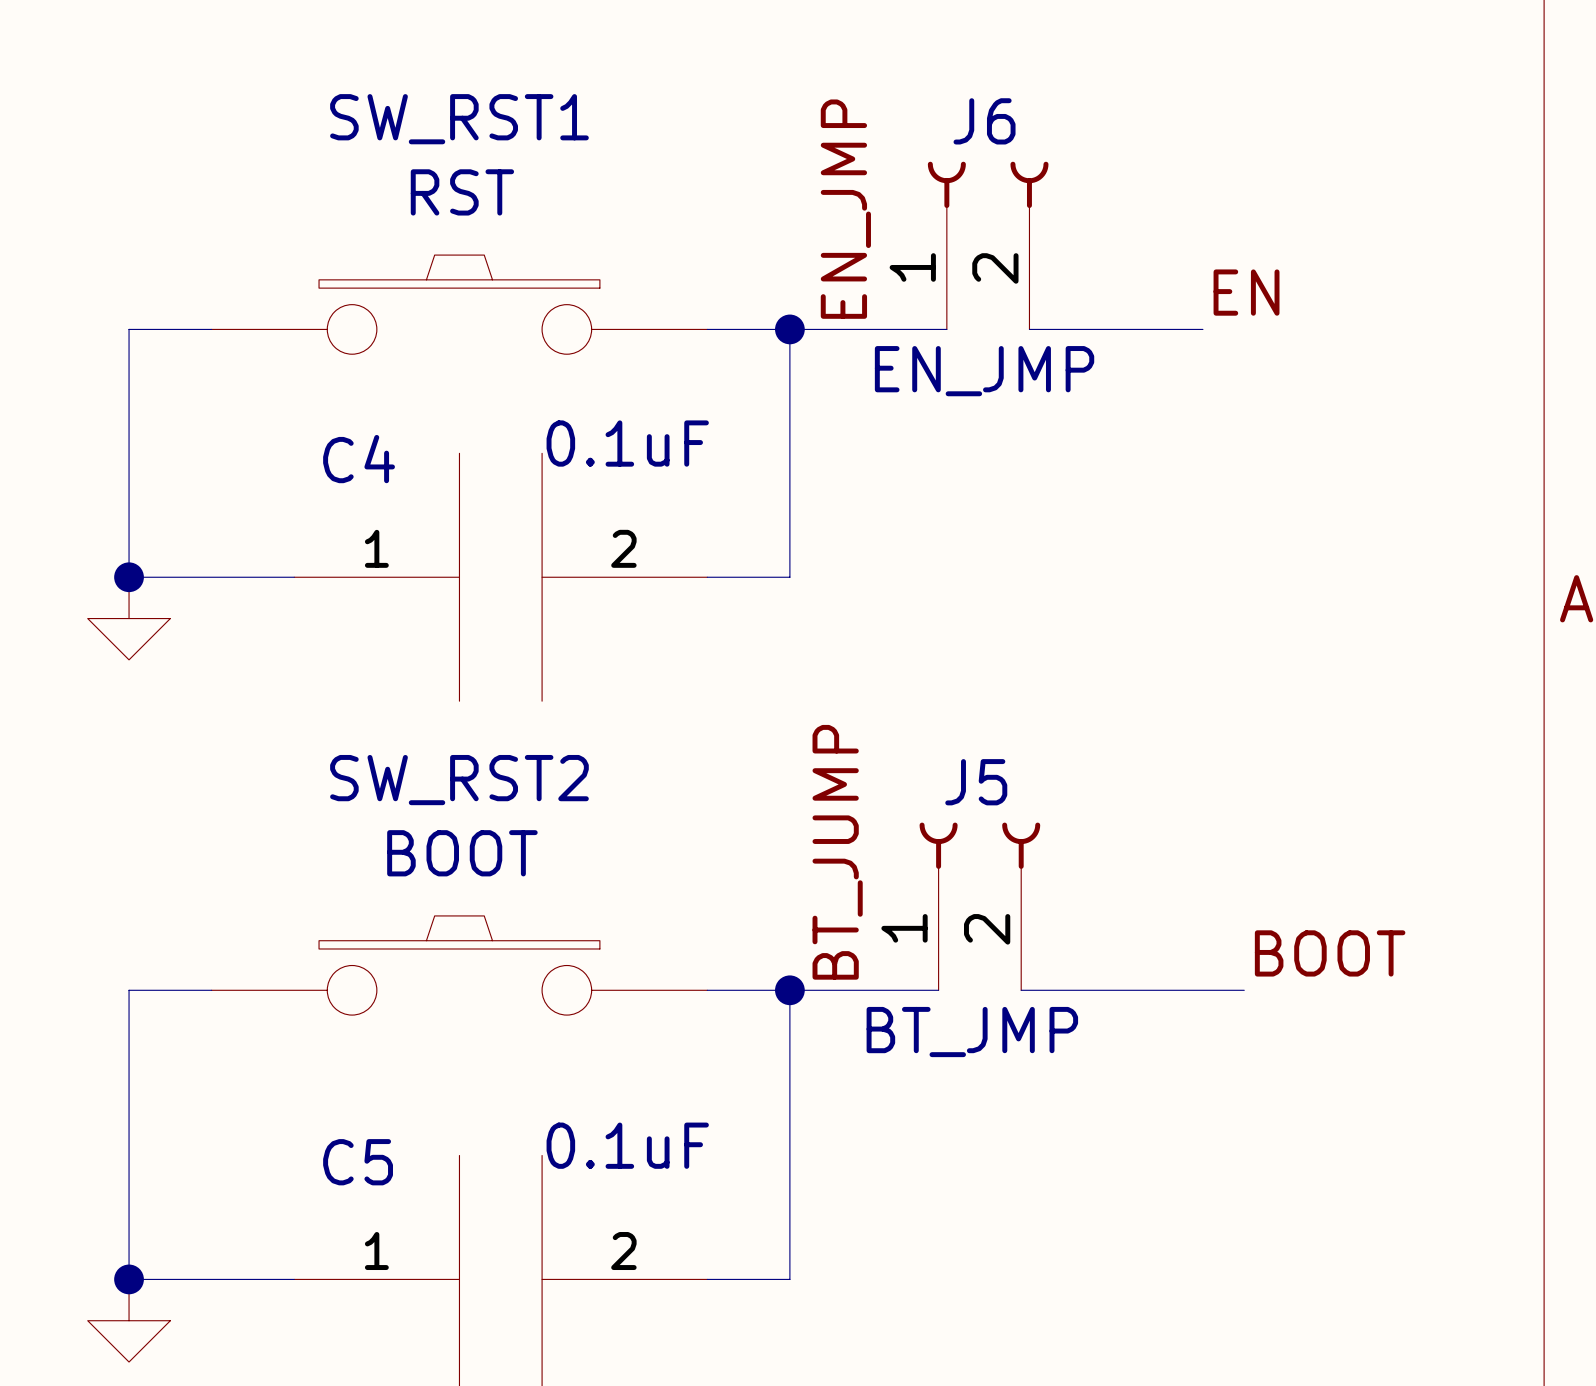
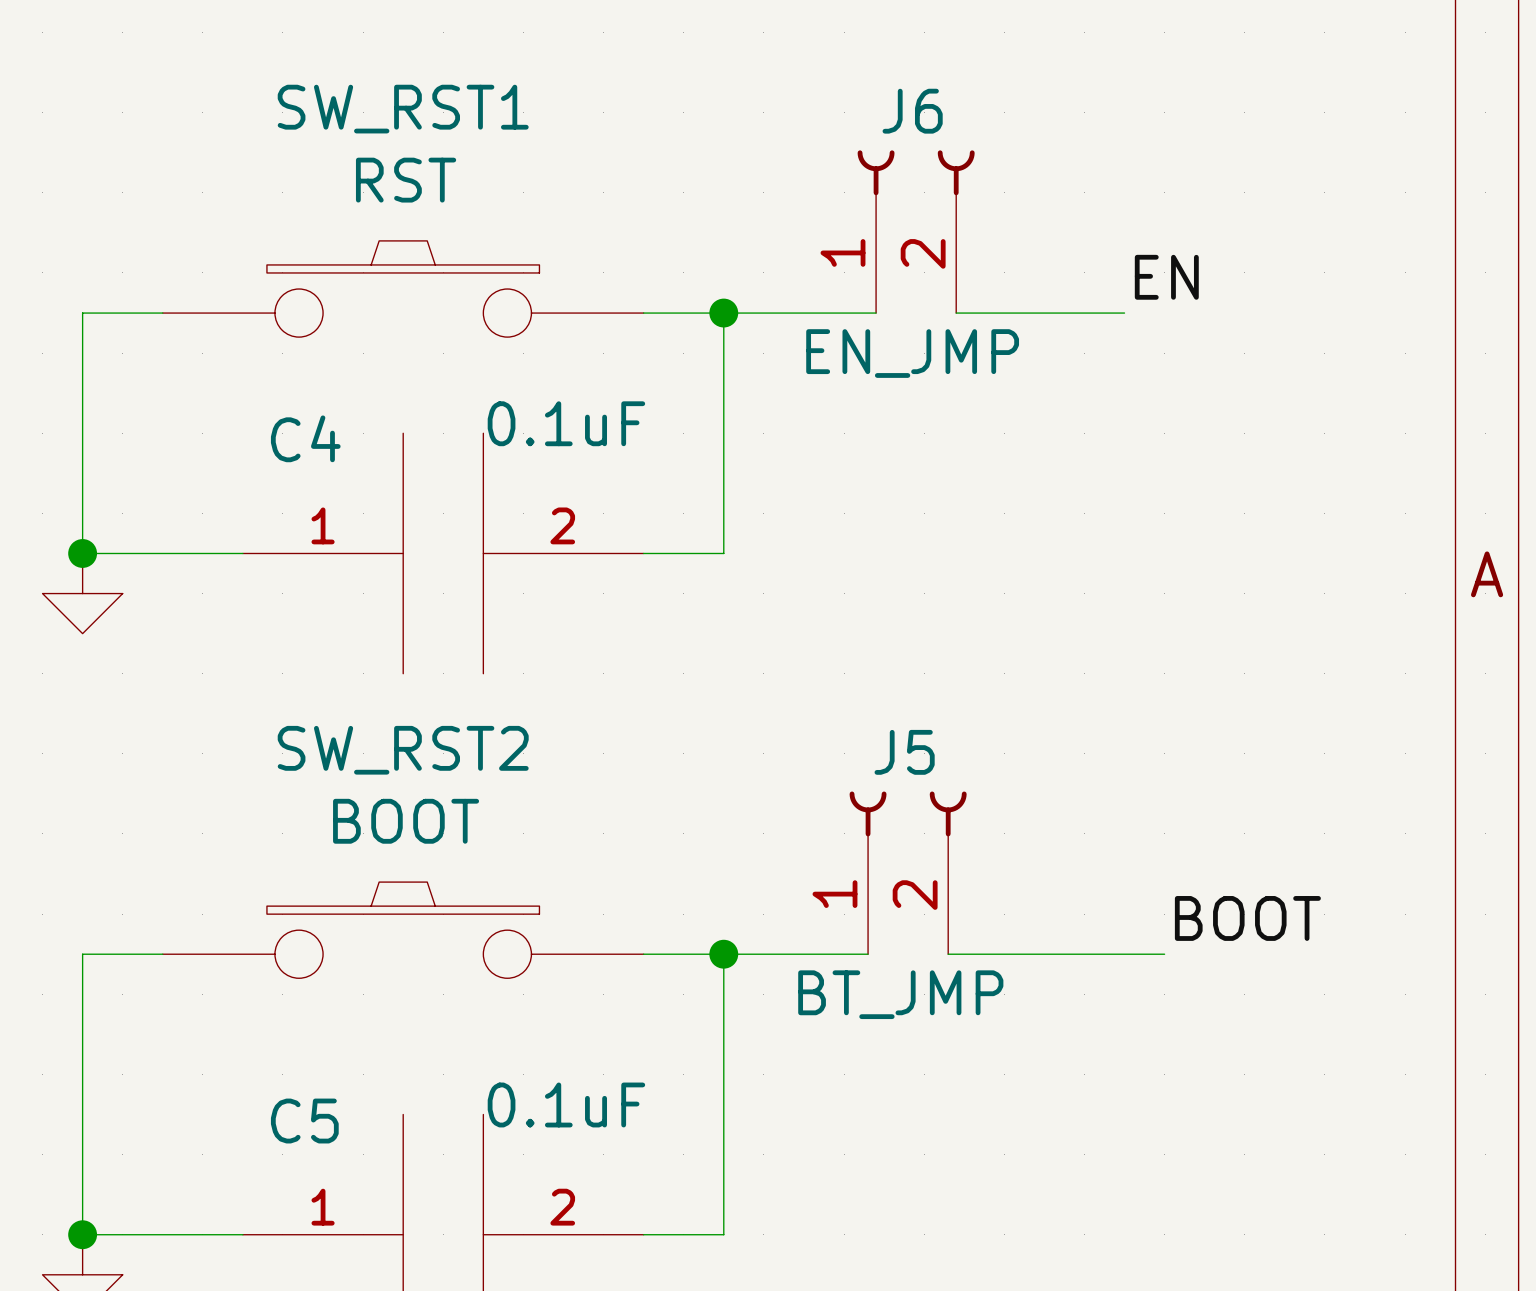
label: EN_JMP (845, 209) -> none
label: BT_JUMP (837, 852) -> none

